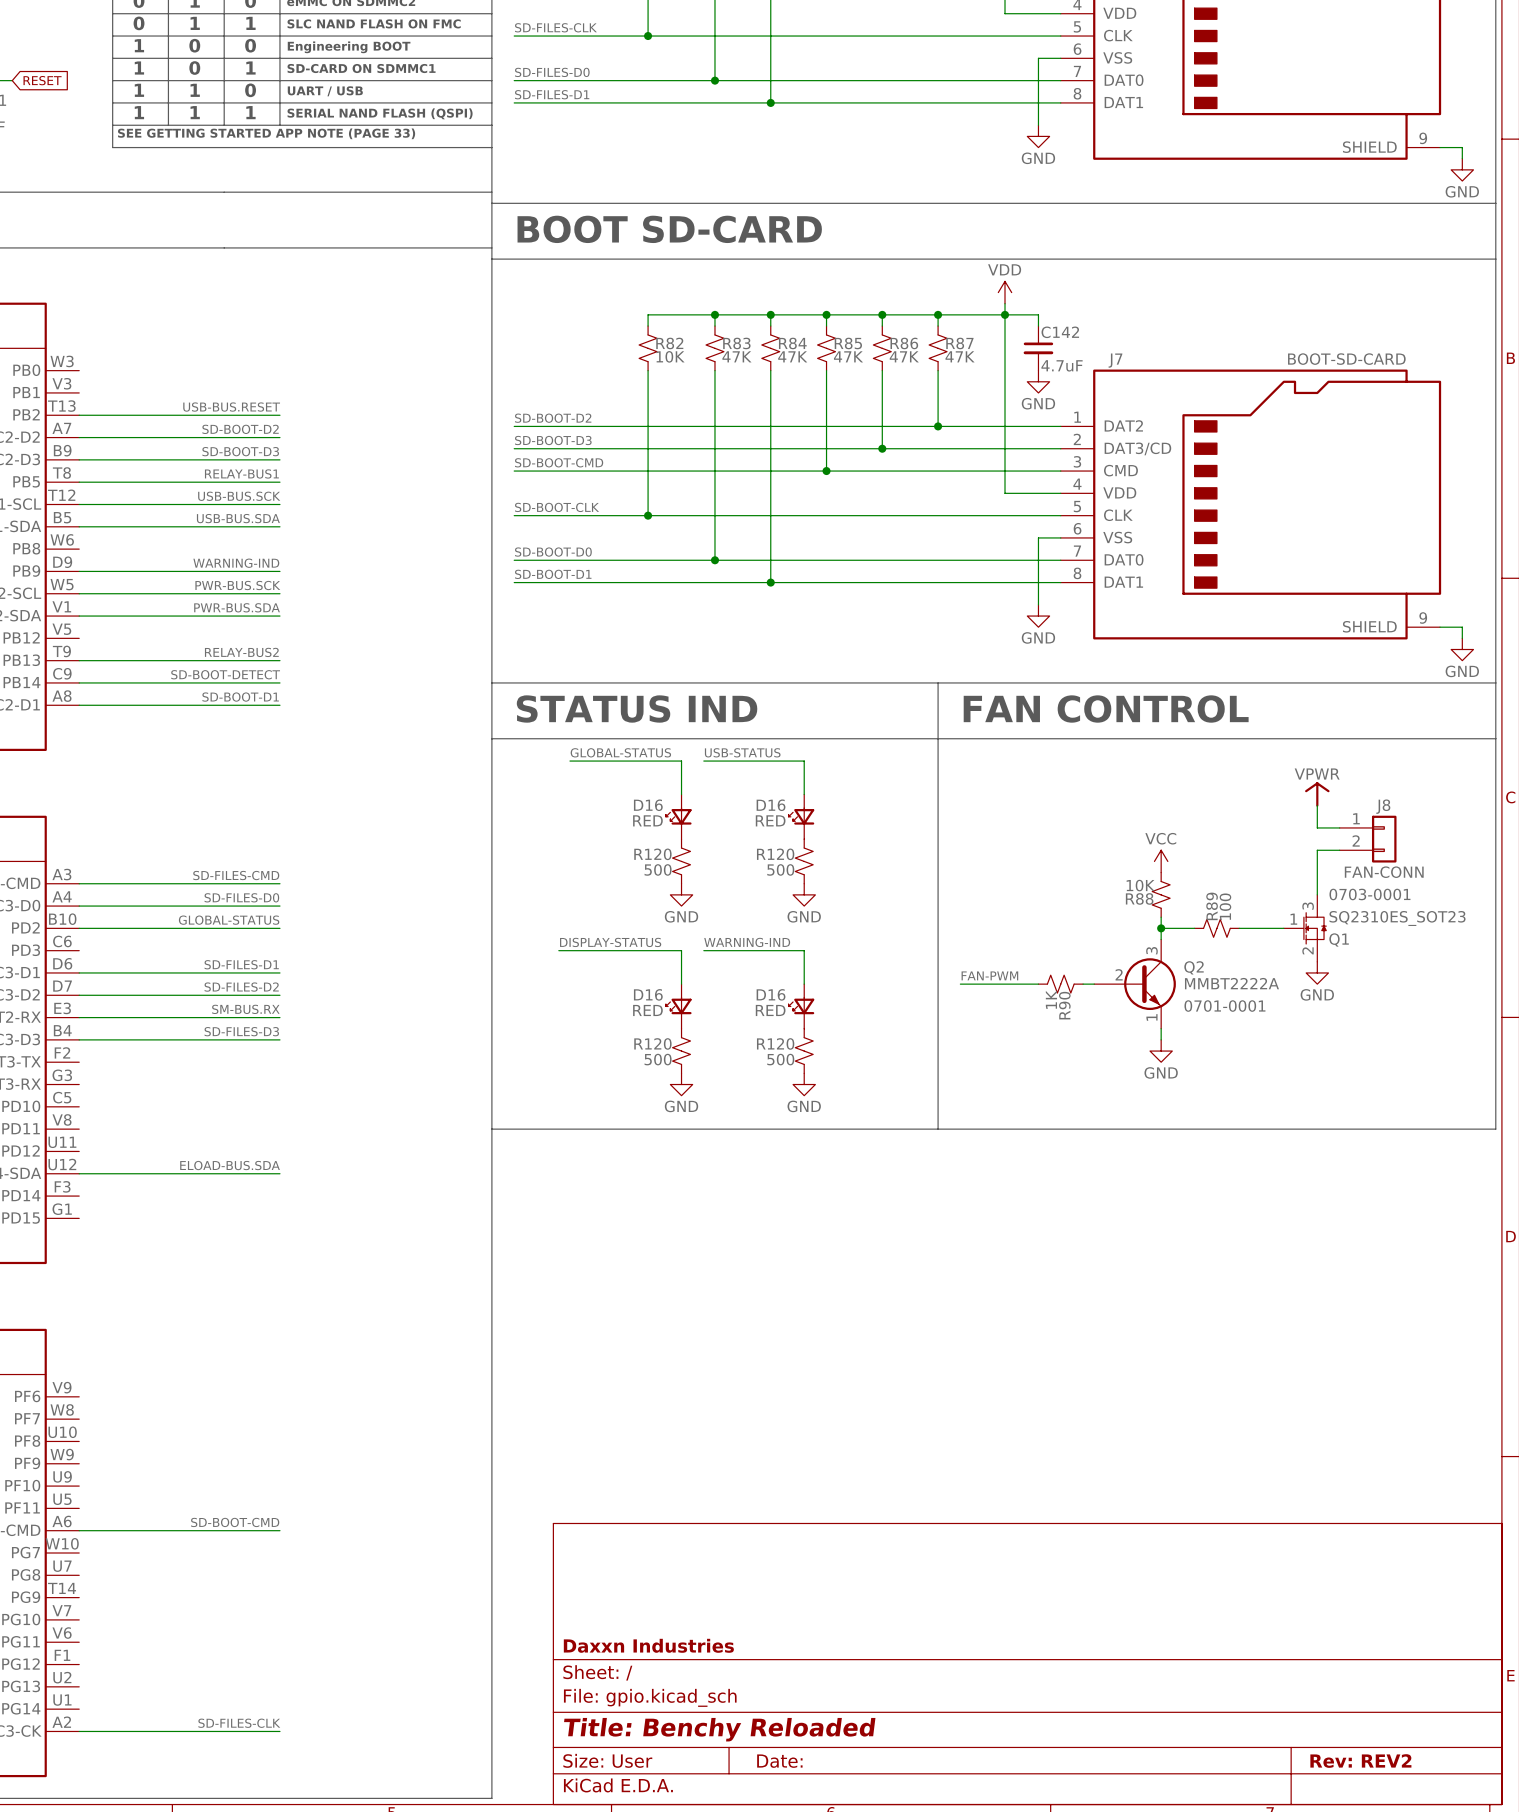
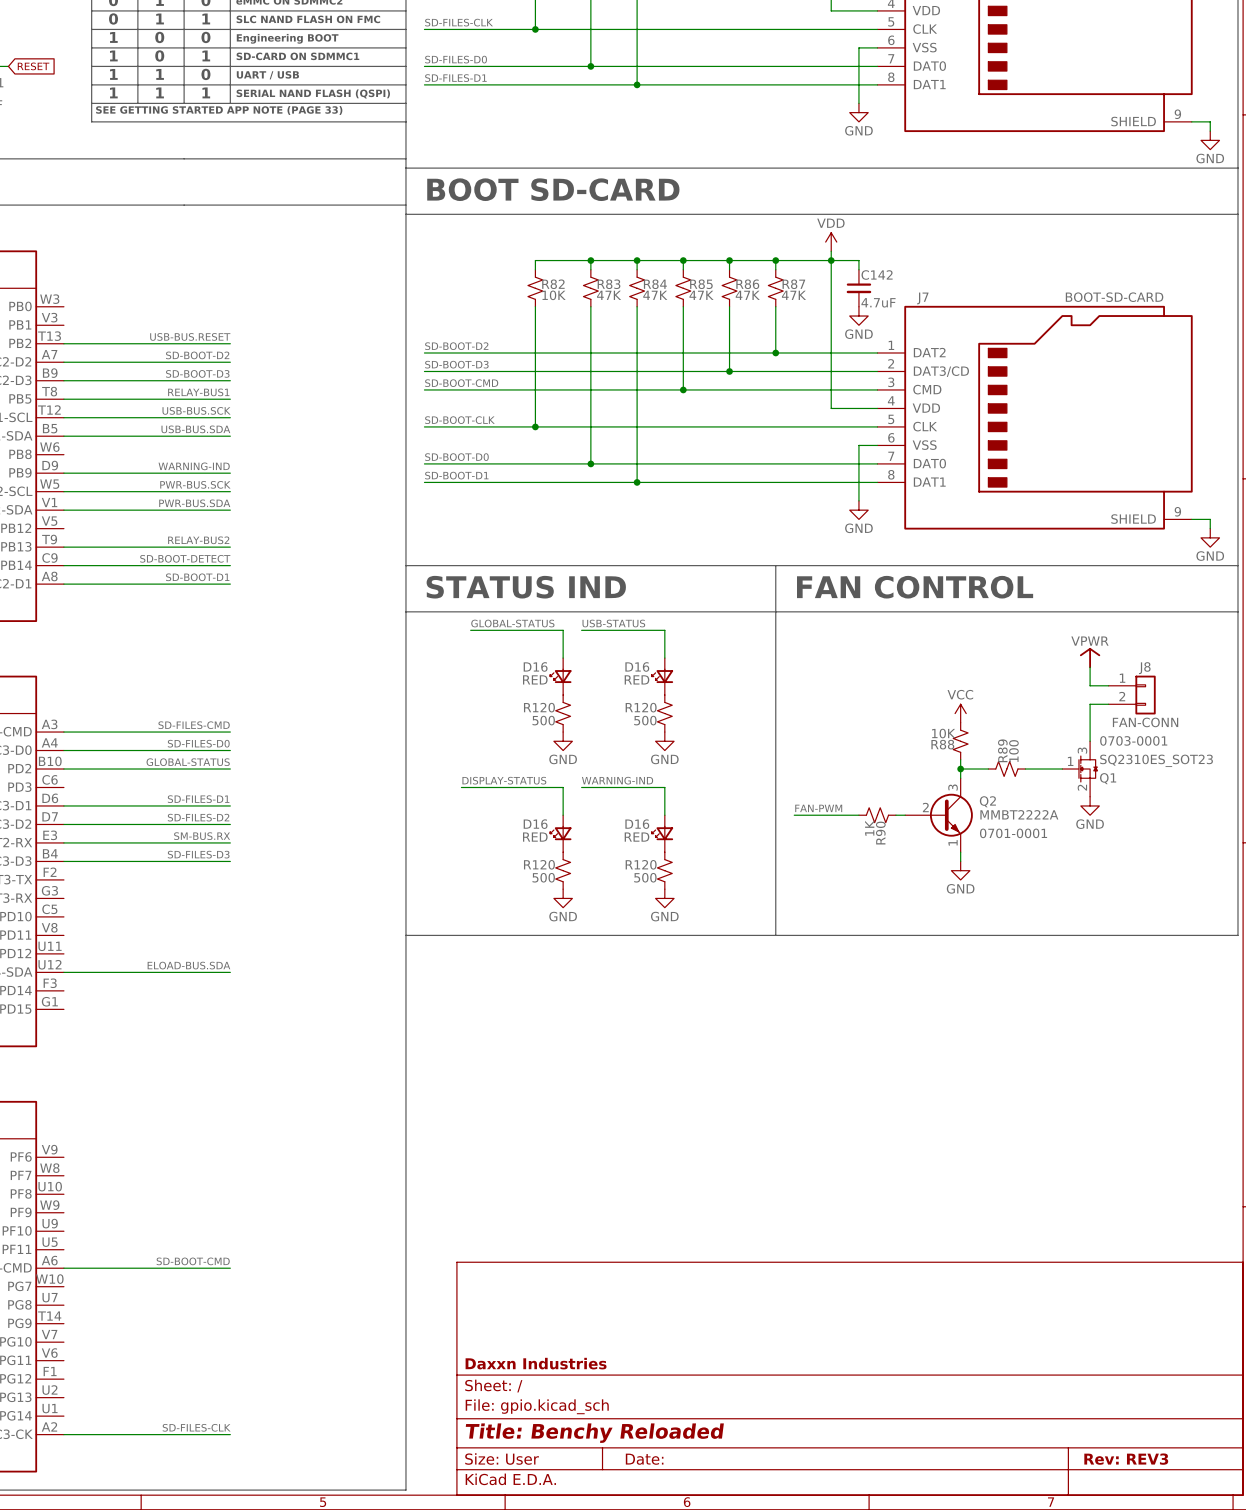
title block: Rev: REV2 (1360, 1761) -> Rev: REV3 (1126, 1459)

